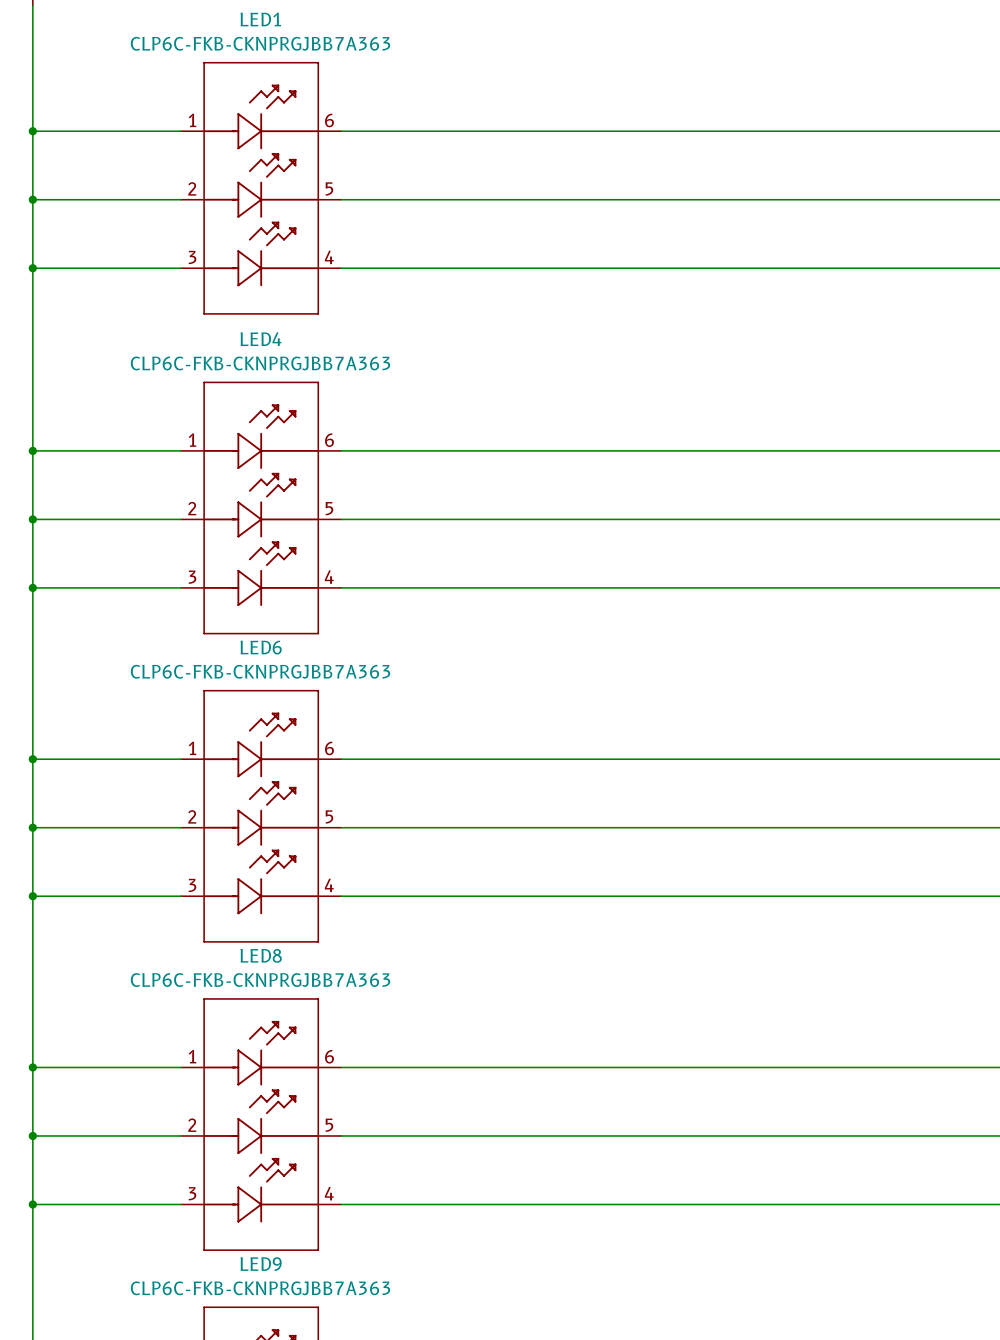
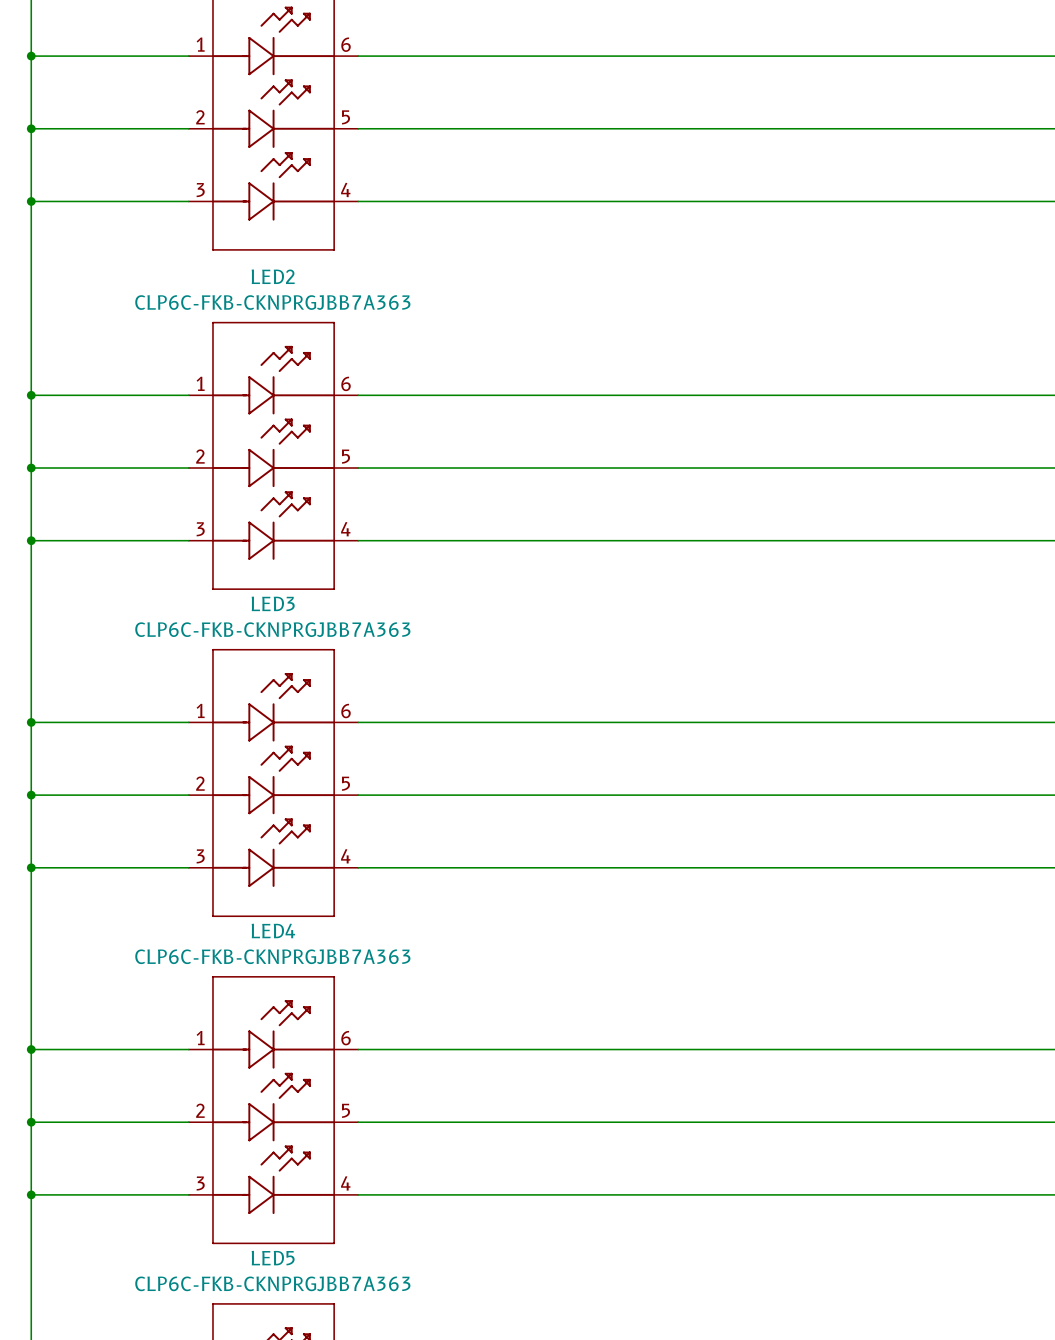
LED4 name: LED4 (261, 339) -> LED2 (273, 276)
LED6 name: LED6 (261, 647) -> LED3 (273, 603)
LED8 name: LED8 (261, 955) -> LED4 (273, 930)
LED9 name: LED9 (261, 1264) -> LED5 (273, 1258)

